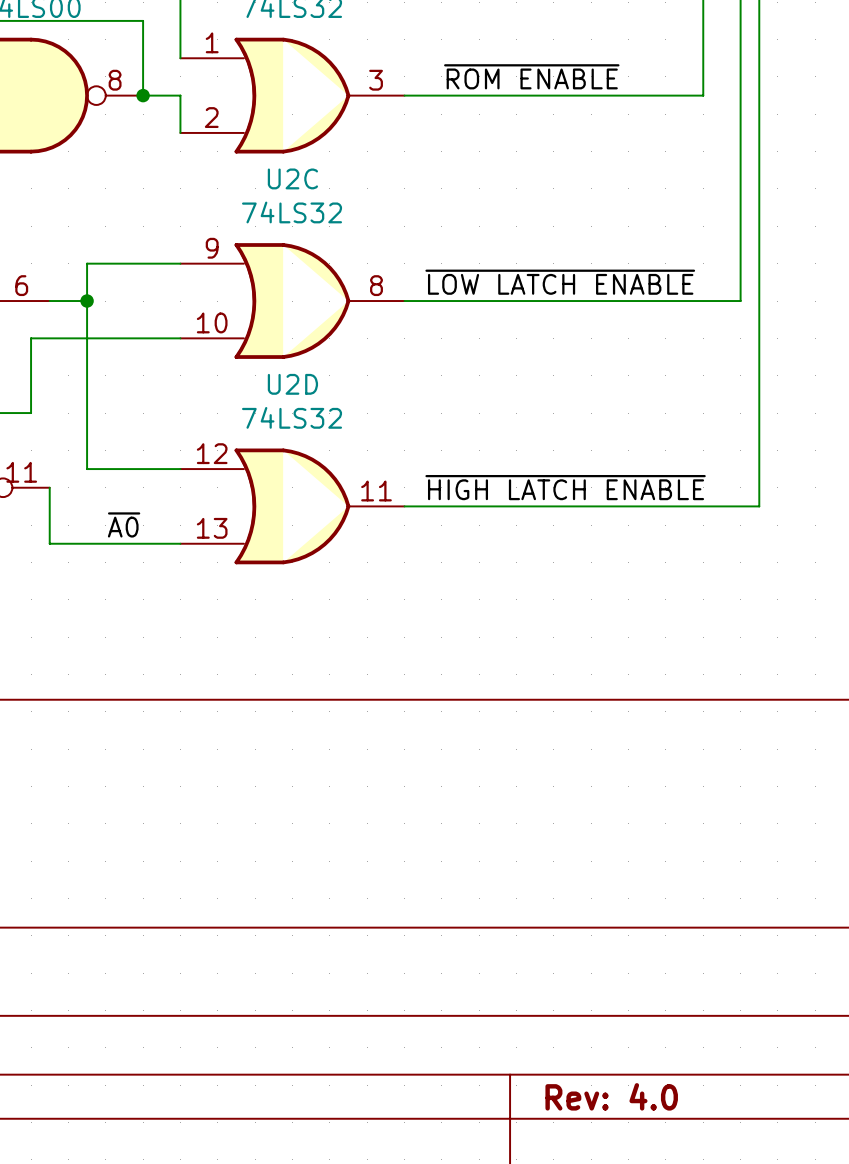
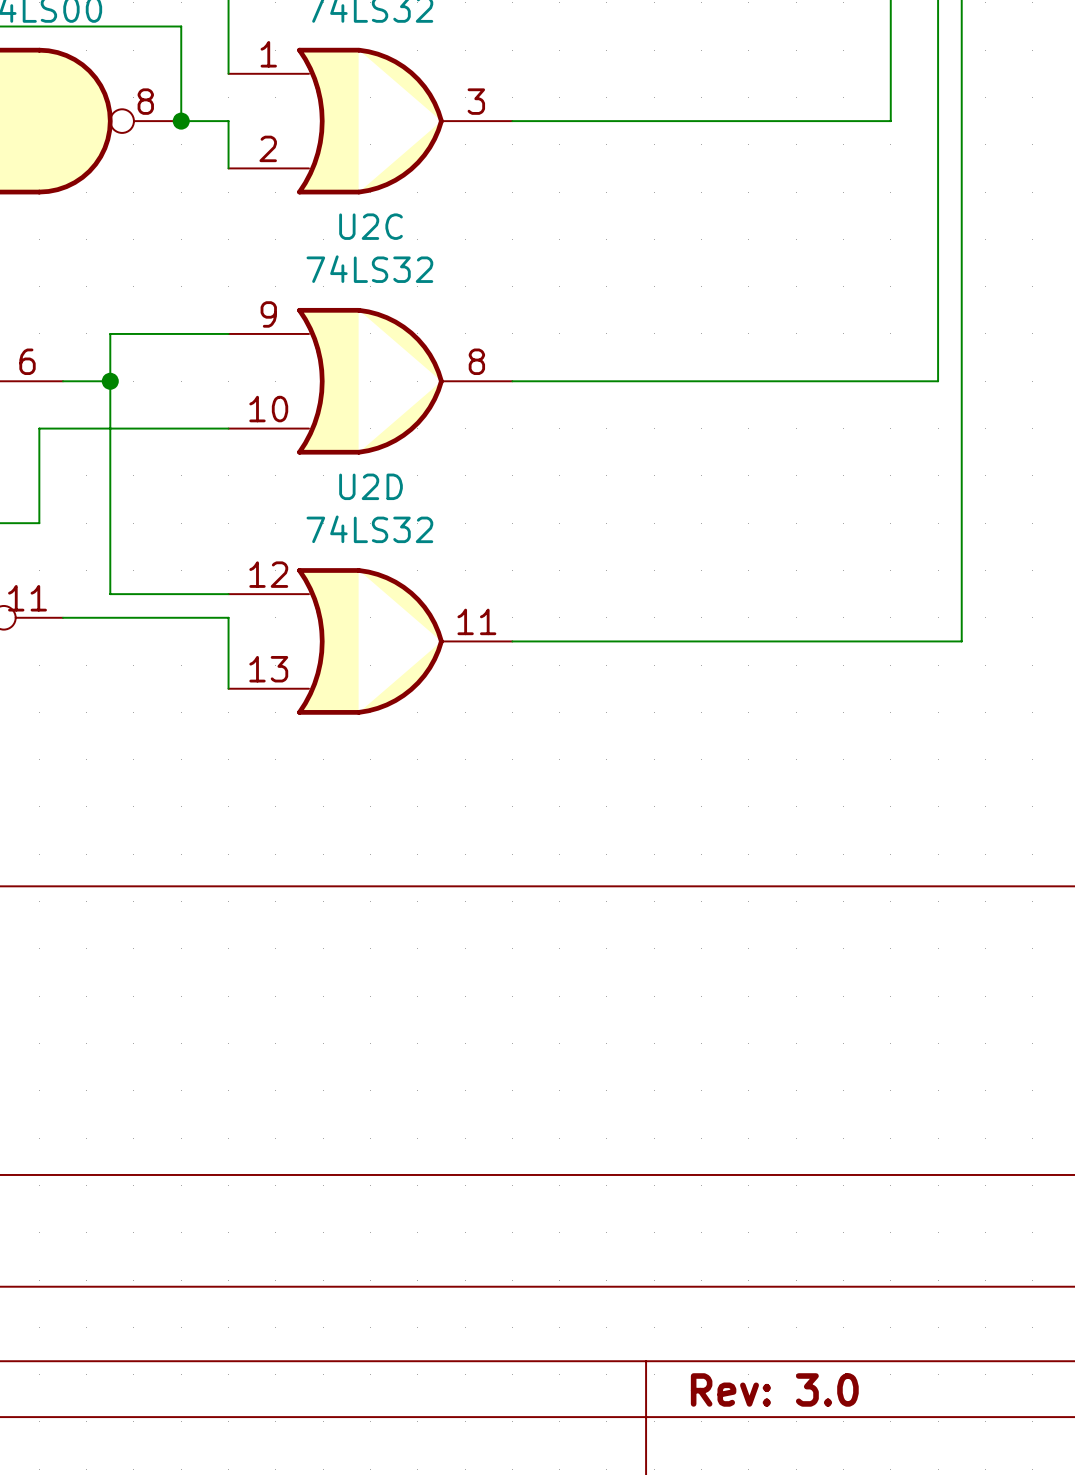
label: ~{ROM ENABLE} (531, 76) -> none
label: ~{LOW LATCH ENABLE} (560, 282) -> none
wire: (49, 487) (49, 543) (180, 543) -> (62, 617) (228, 617) (228, 688)
label: ~{HIGH LATCH ENABLE} (565, 487) -> none
label: ~{A0} (124, 524) -> none
title block: Rev: 4.0 (611, 1096) -> Rev: 3.0 (774, 1389)

